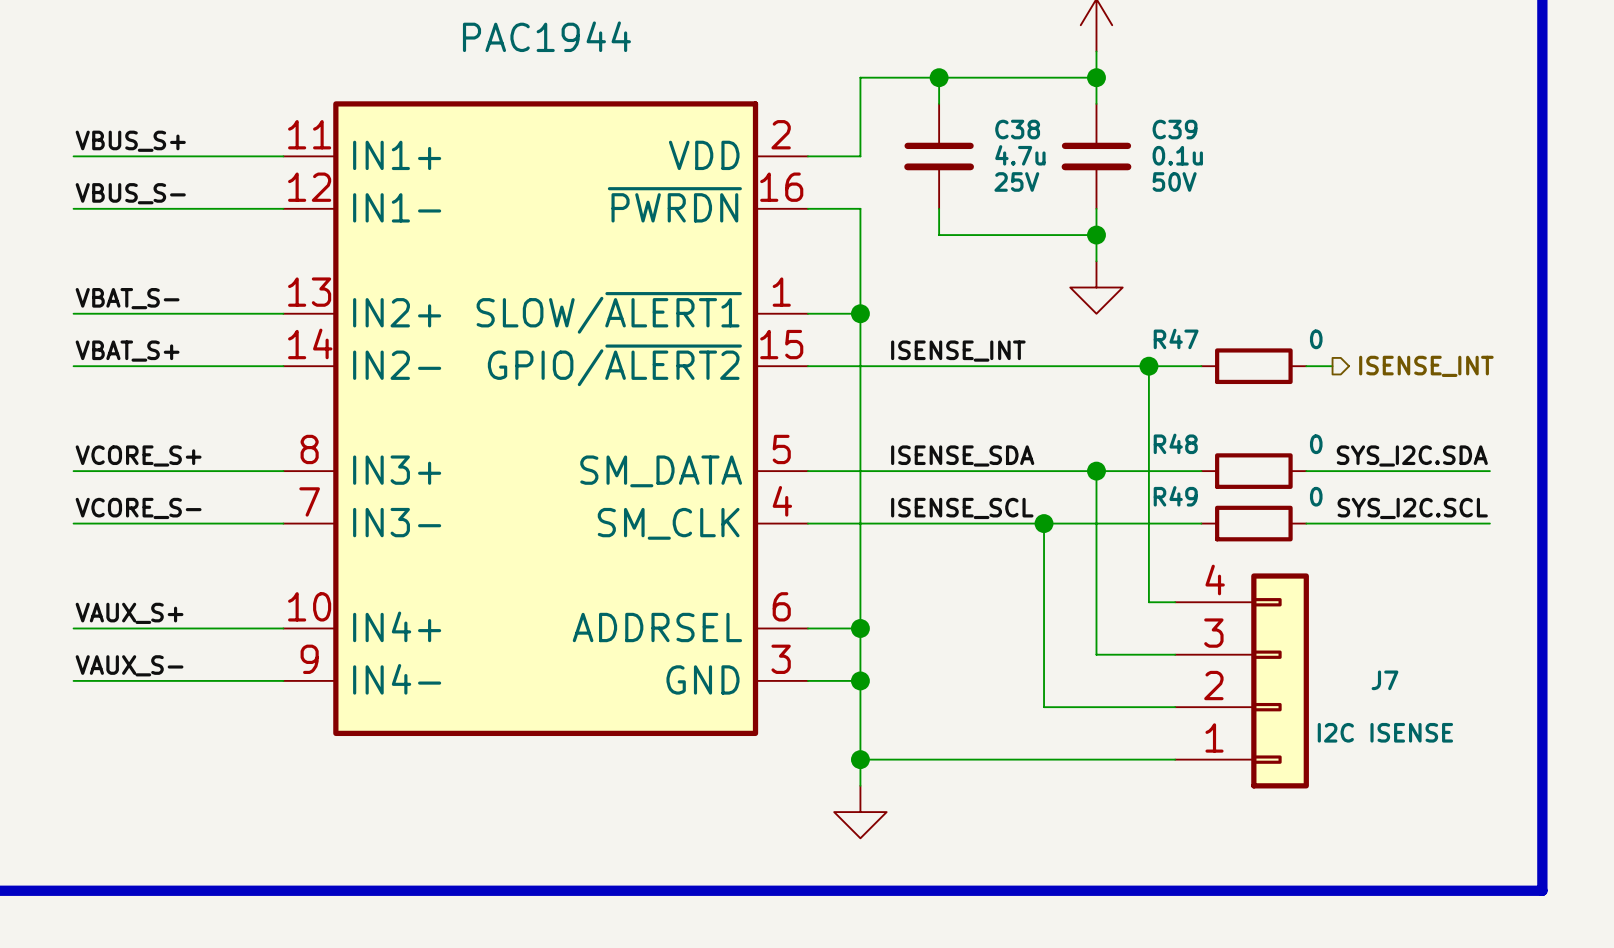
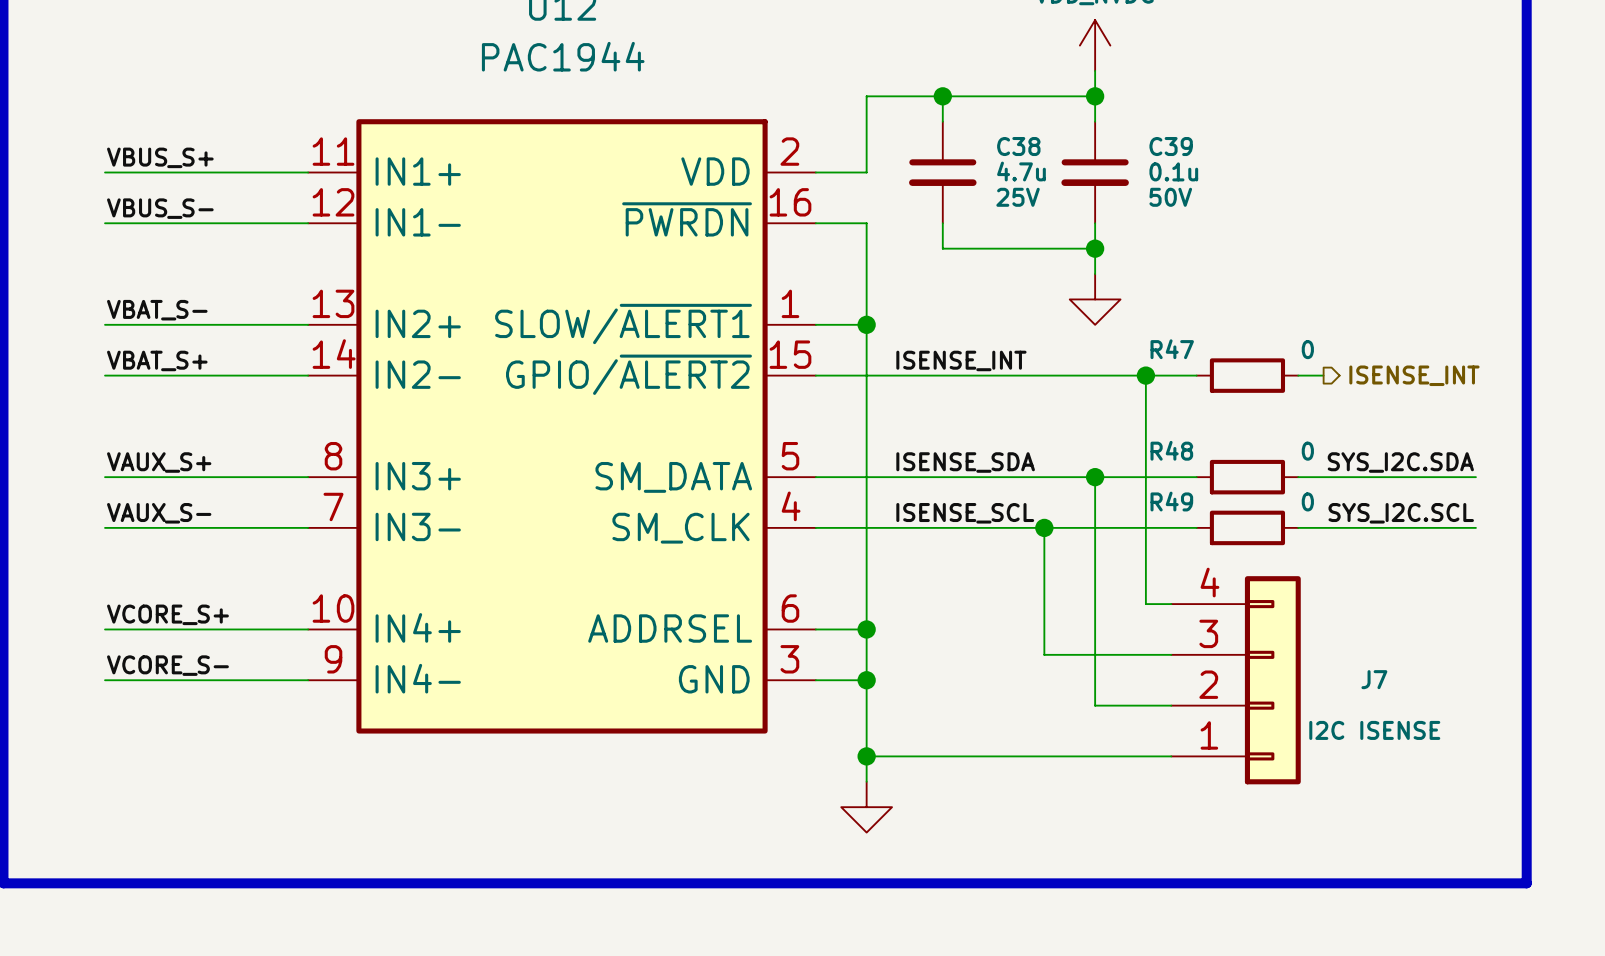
label: VCORE_S+ (138, 455) -> VAUX_S+ (159, 462)
label: VCORE_S- (138, 508) -> VAUX_S- (159, 513)
label: VAUX_S+ (129, 613) -> VCORE_S+ (167, 614)
wire: (1044, 654) (1044, 707) (1096, 707) -> (1044, 654) (1095, 654) (1095, 705)
label: VAUX_S- (129, 665) -> VCORE_S- (167, 665)

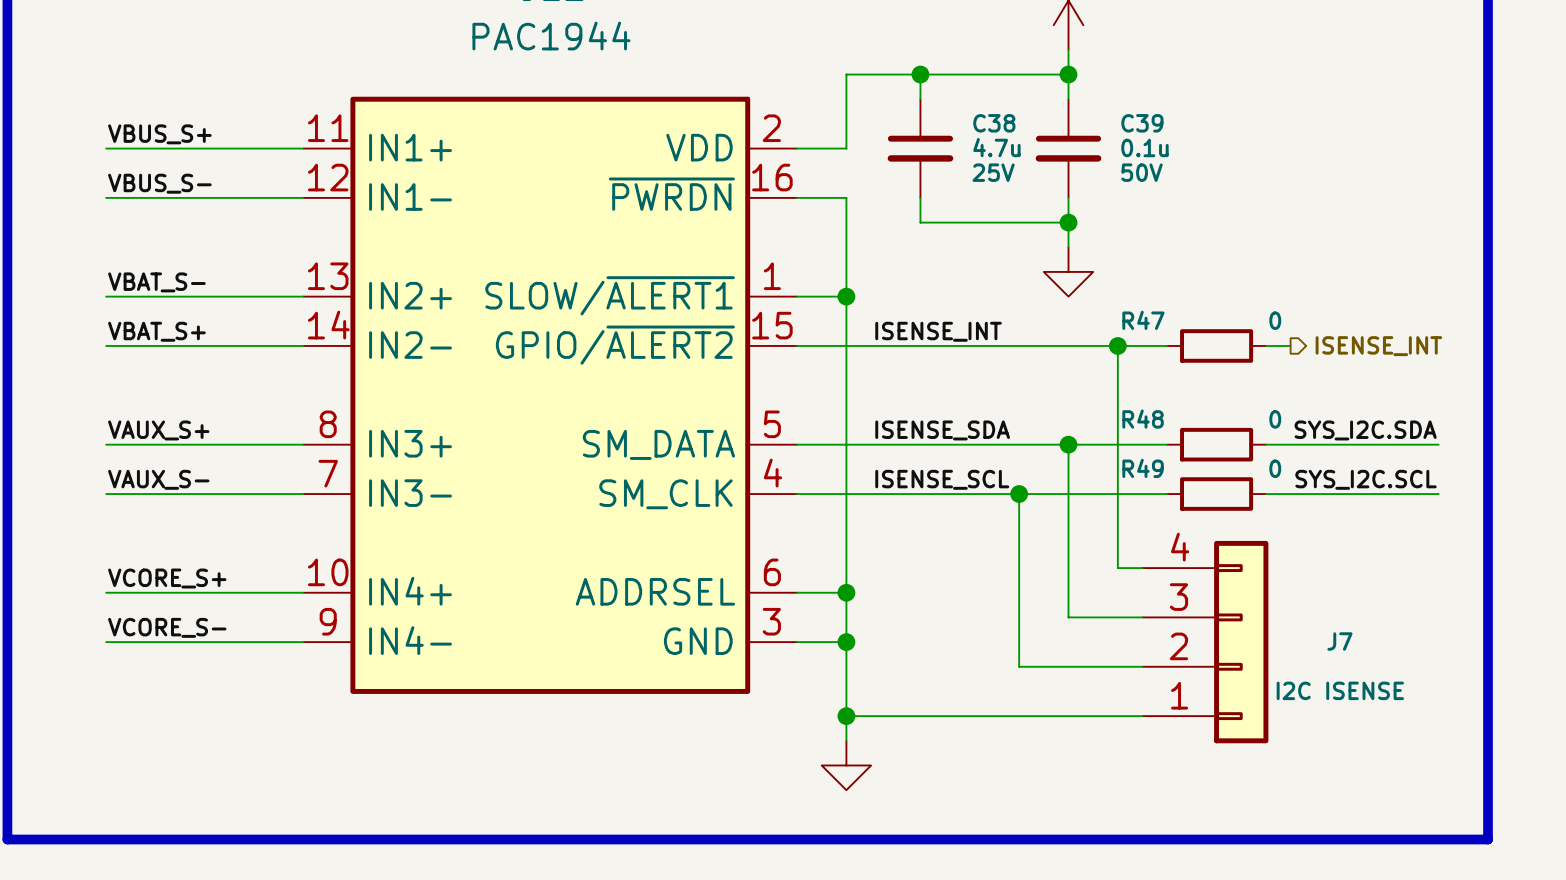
wire: (1044, 654) (1095, 654) (1095, 705) -> (1019, 617) (1019, 666) (1068, 666)

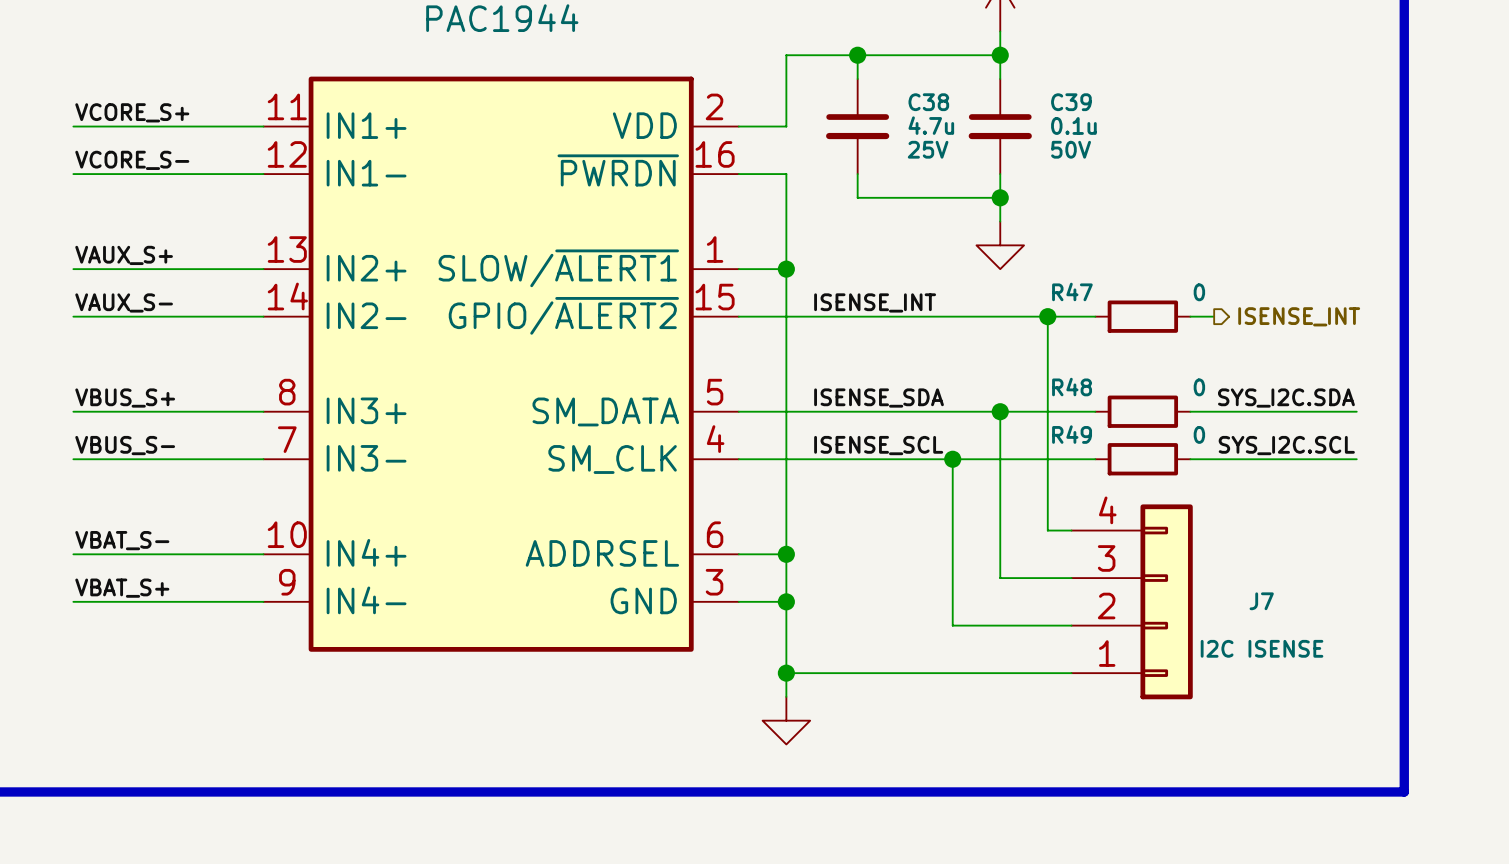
label: VBUS_S+ (159, 134) -> VCORE_S+ (132, 112)
label: VBUS_S- (159, 183) -> VCORE_S- (132, 160)
label: VBAT_S- (156, 282) -> VAUX_S+ (124, 255)
label: VBAT_S+ (156, 331) -> VAUX_S- (124, 302)
label: VAUX_S+ (158, 430) -> VBUS_S+ (125, 398)
label: VAUX_S- (158, 479) -> VBUS_S- (125, 445)
label: VCORE_S+ (167, 578) -> VBAT_S- (122, 540)
label: VCORE_S- (167, 627) -> VBAT_S+ (122, 588)

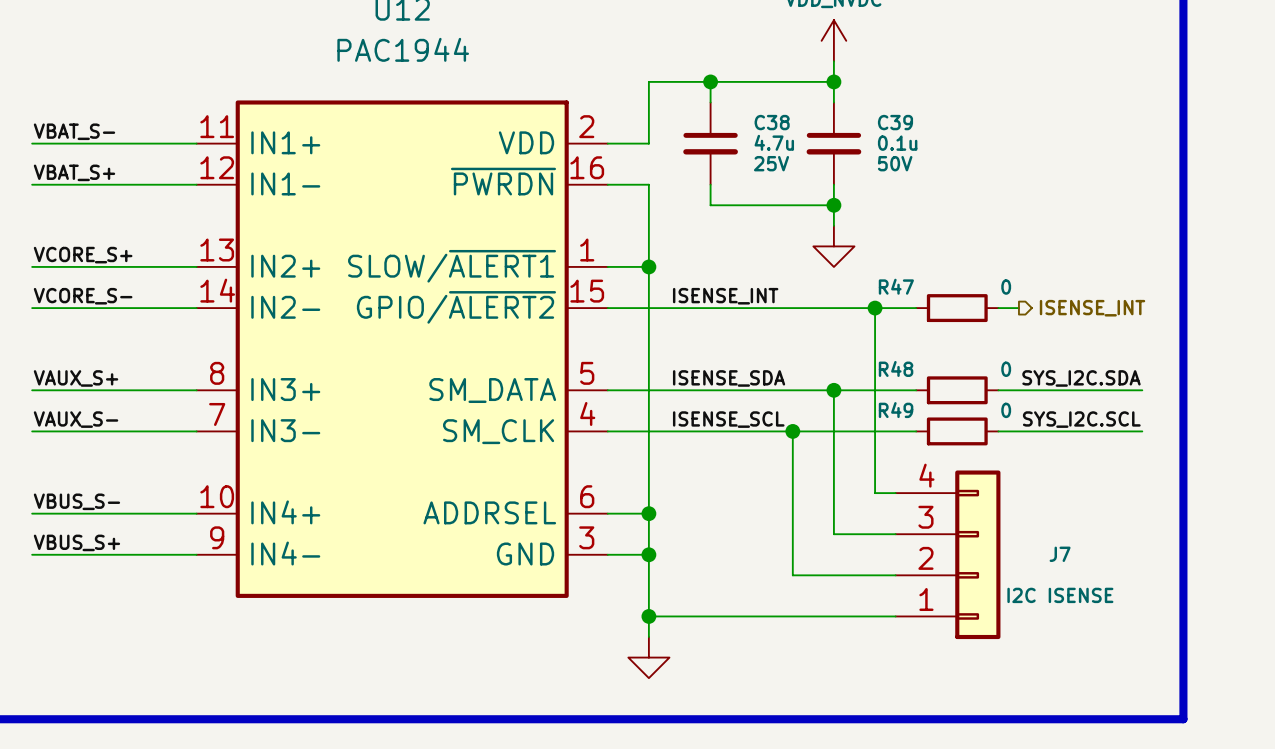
label: VCORE_S+ (132, 112) -> VBAT_S- (74, 131)
label: VCORE_S- (132, 160) -> VBAT_S+ (74, 172)
label: VAUX_S+ (124, 255) -> VCORE_S+ (83, 255)
label: VAUX_S- (124, 302) -> VCORE_S- (83, 296)
label: VBUS_S+ (125, 398) -> VAUX_S+ (76, 378)
label: VBUS_S- (125, 445) -> VAUX_S- (76, 419)
label: VBAT_S- (122, 540) -> VBUS_S- (76, 501)
label: VBAT_S+ (122, 588) -> VBUS_S+ (76, 542)

